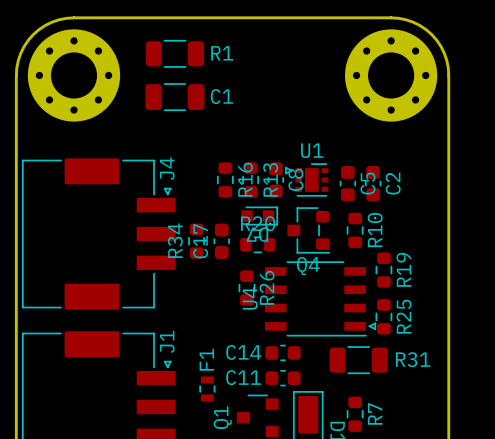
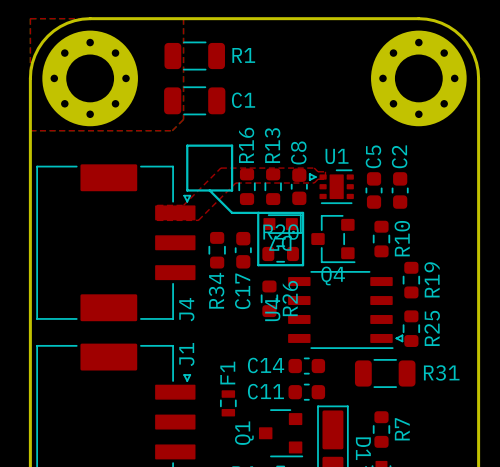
top zone outline: none -> (30, 18) (183, 18) (183, 119) (172, 130) (30, 130) (30, 18)
line: none -> (187, 145) (187, 190) (232, 190) (232, 145) (187, 145)
top zone outline: none -> (220, 168) (183, 205) (157, 205) (157, 220) (198, 220) (235, 183) (314, 183) (317, 179) (325, 179) (325, 171) (317, 171) (314, 168) (220, 168)
J4 name position: J4 (167, 168) -> J4 (186, 309)
R16 name position: R16 (245, 179) -> R16 (246, 145)
R13 name position: R13 (270, 179) -> R13 (272, 145)
C8 name position: C8 (295, 179) -> C8 (298, 152)
line: none -> (209, 190) (232, 212) (303, 212) (303, 265) (258, 265) (258, 212)
C5 name position: C5 (367, 183) -> C5 (373, 156)
C2 name position: C2 (393, 183) -> C2 (399, 156)
R34 name position: R34 (175, 240) -> R34 (216, 290)
C17 name position: C17 (200, 241) -> C17 (242, 291)

